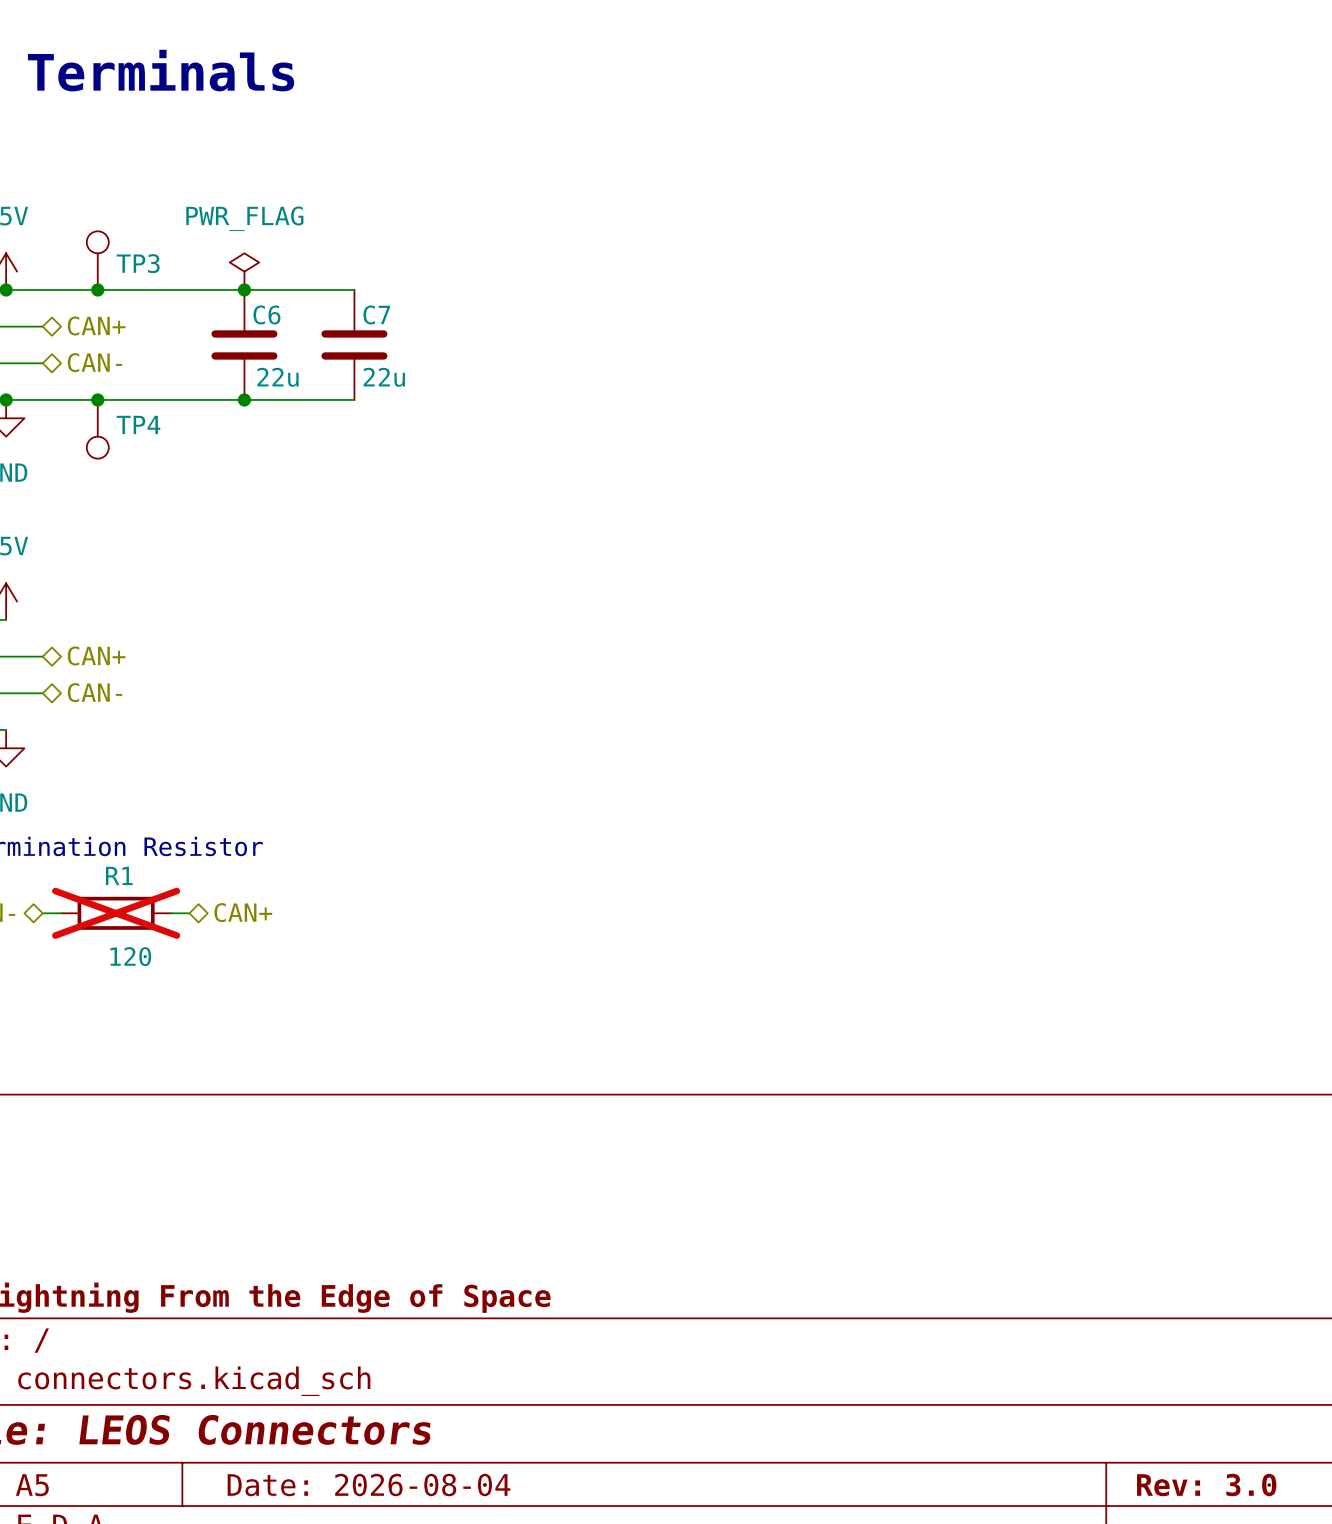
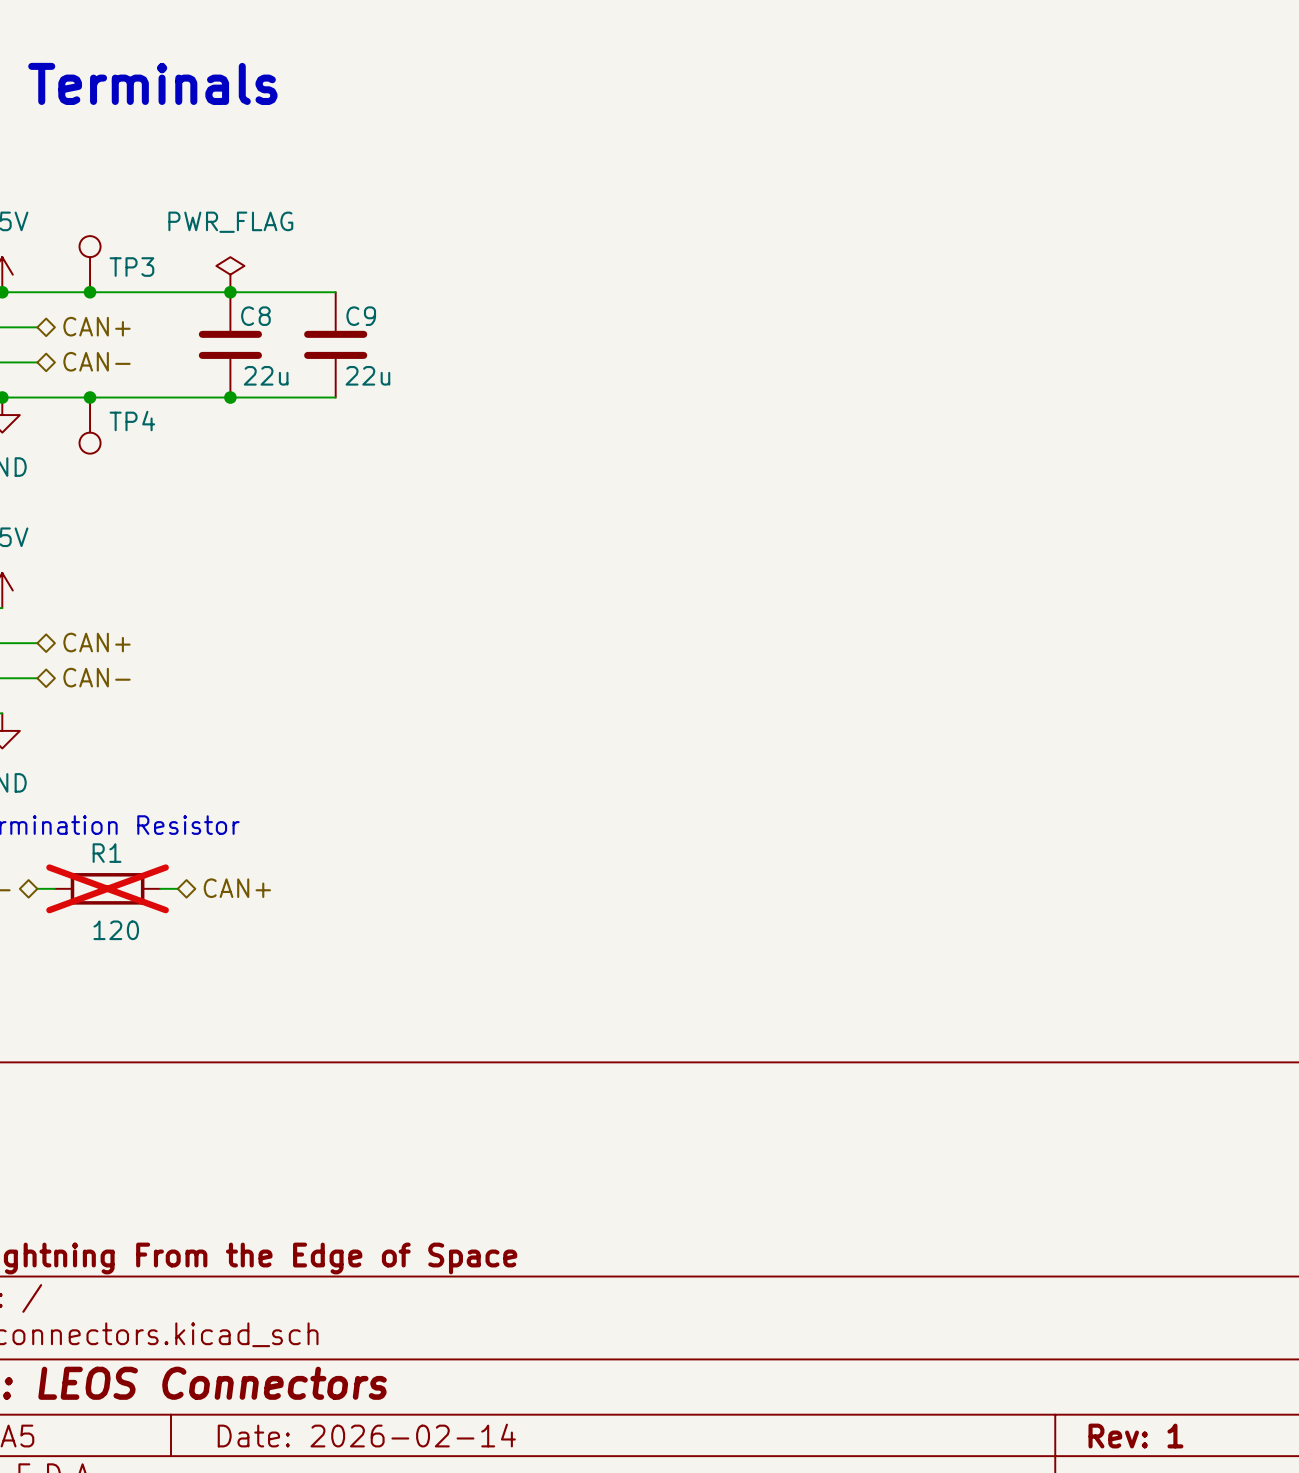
C6 name: C6 (266, 314) -> C8 (255, 316)
C7 name: C7 (376, 314) -> C9 (361, 316)
title block: Date: 2026-08-04 (369, 1485) -> Date: 2026-02-14 (366, 1435)
title block: Rev: 3.0 (1206, 1485) -> Rev: 1 (1135, 1436)

